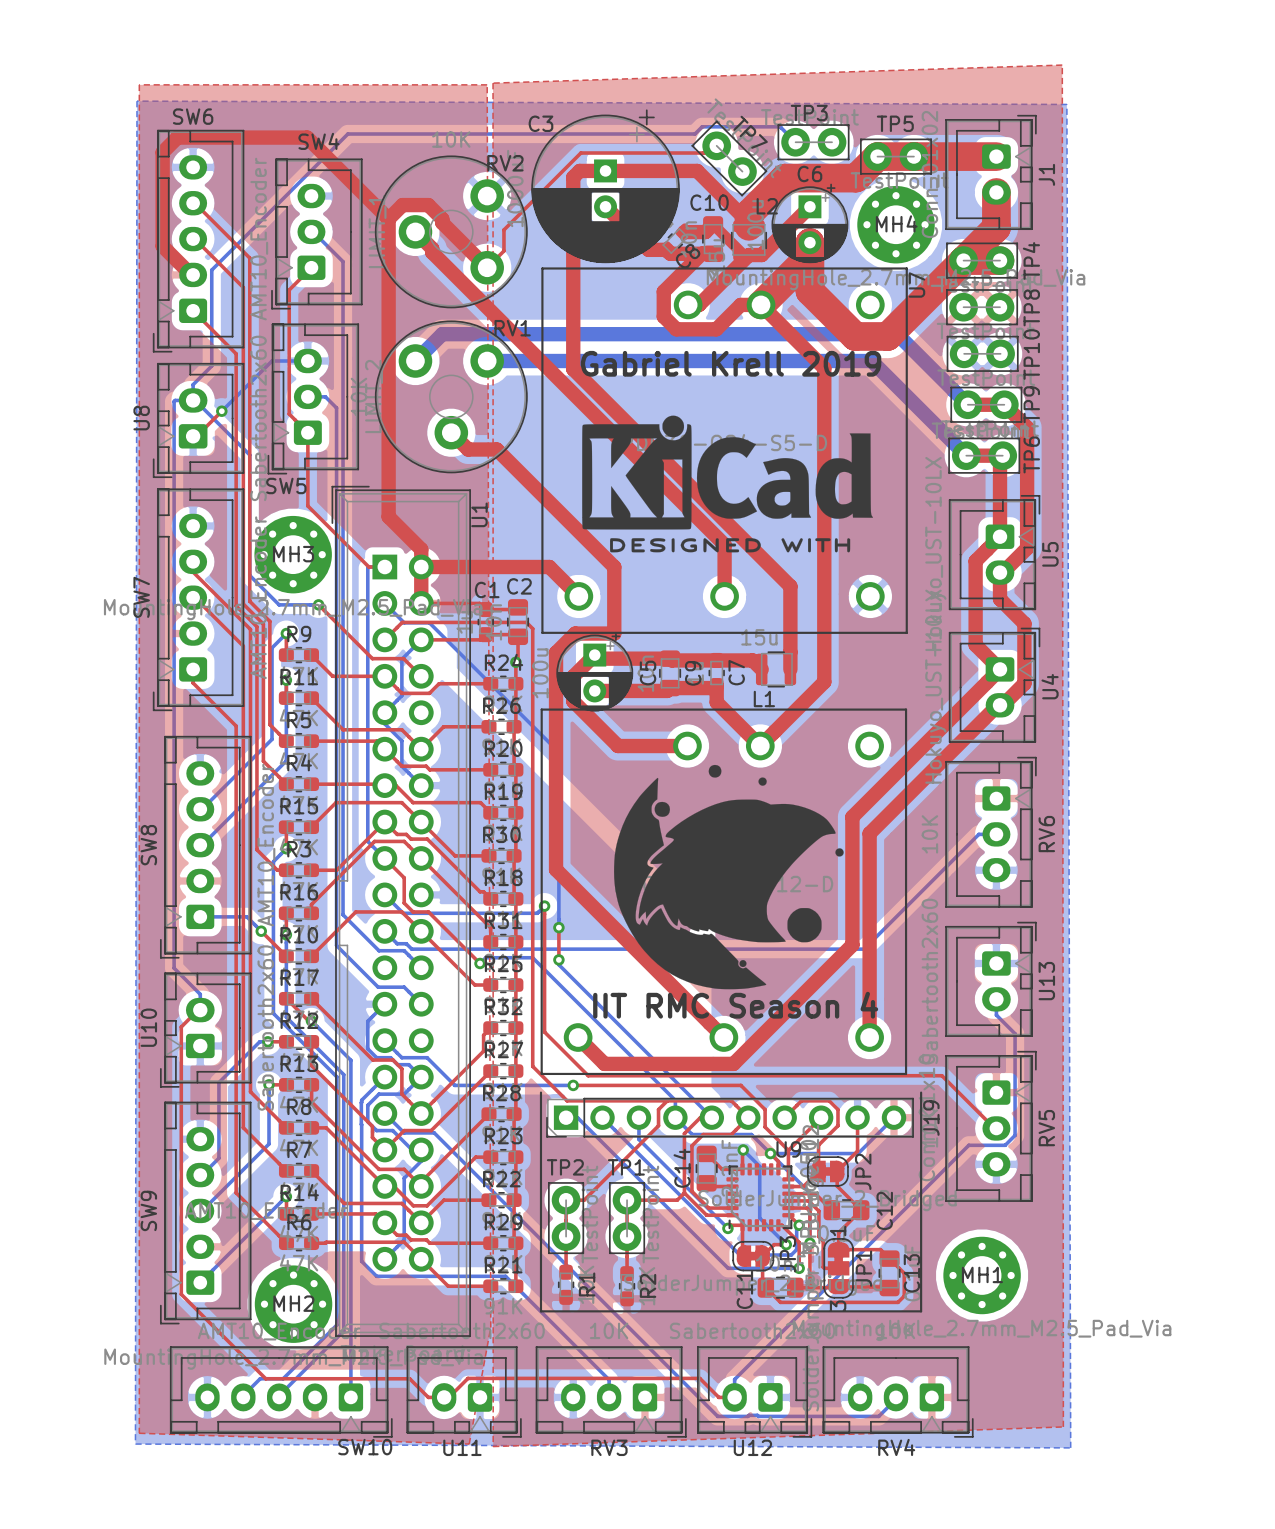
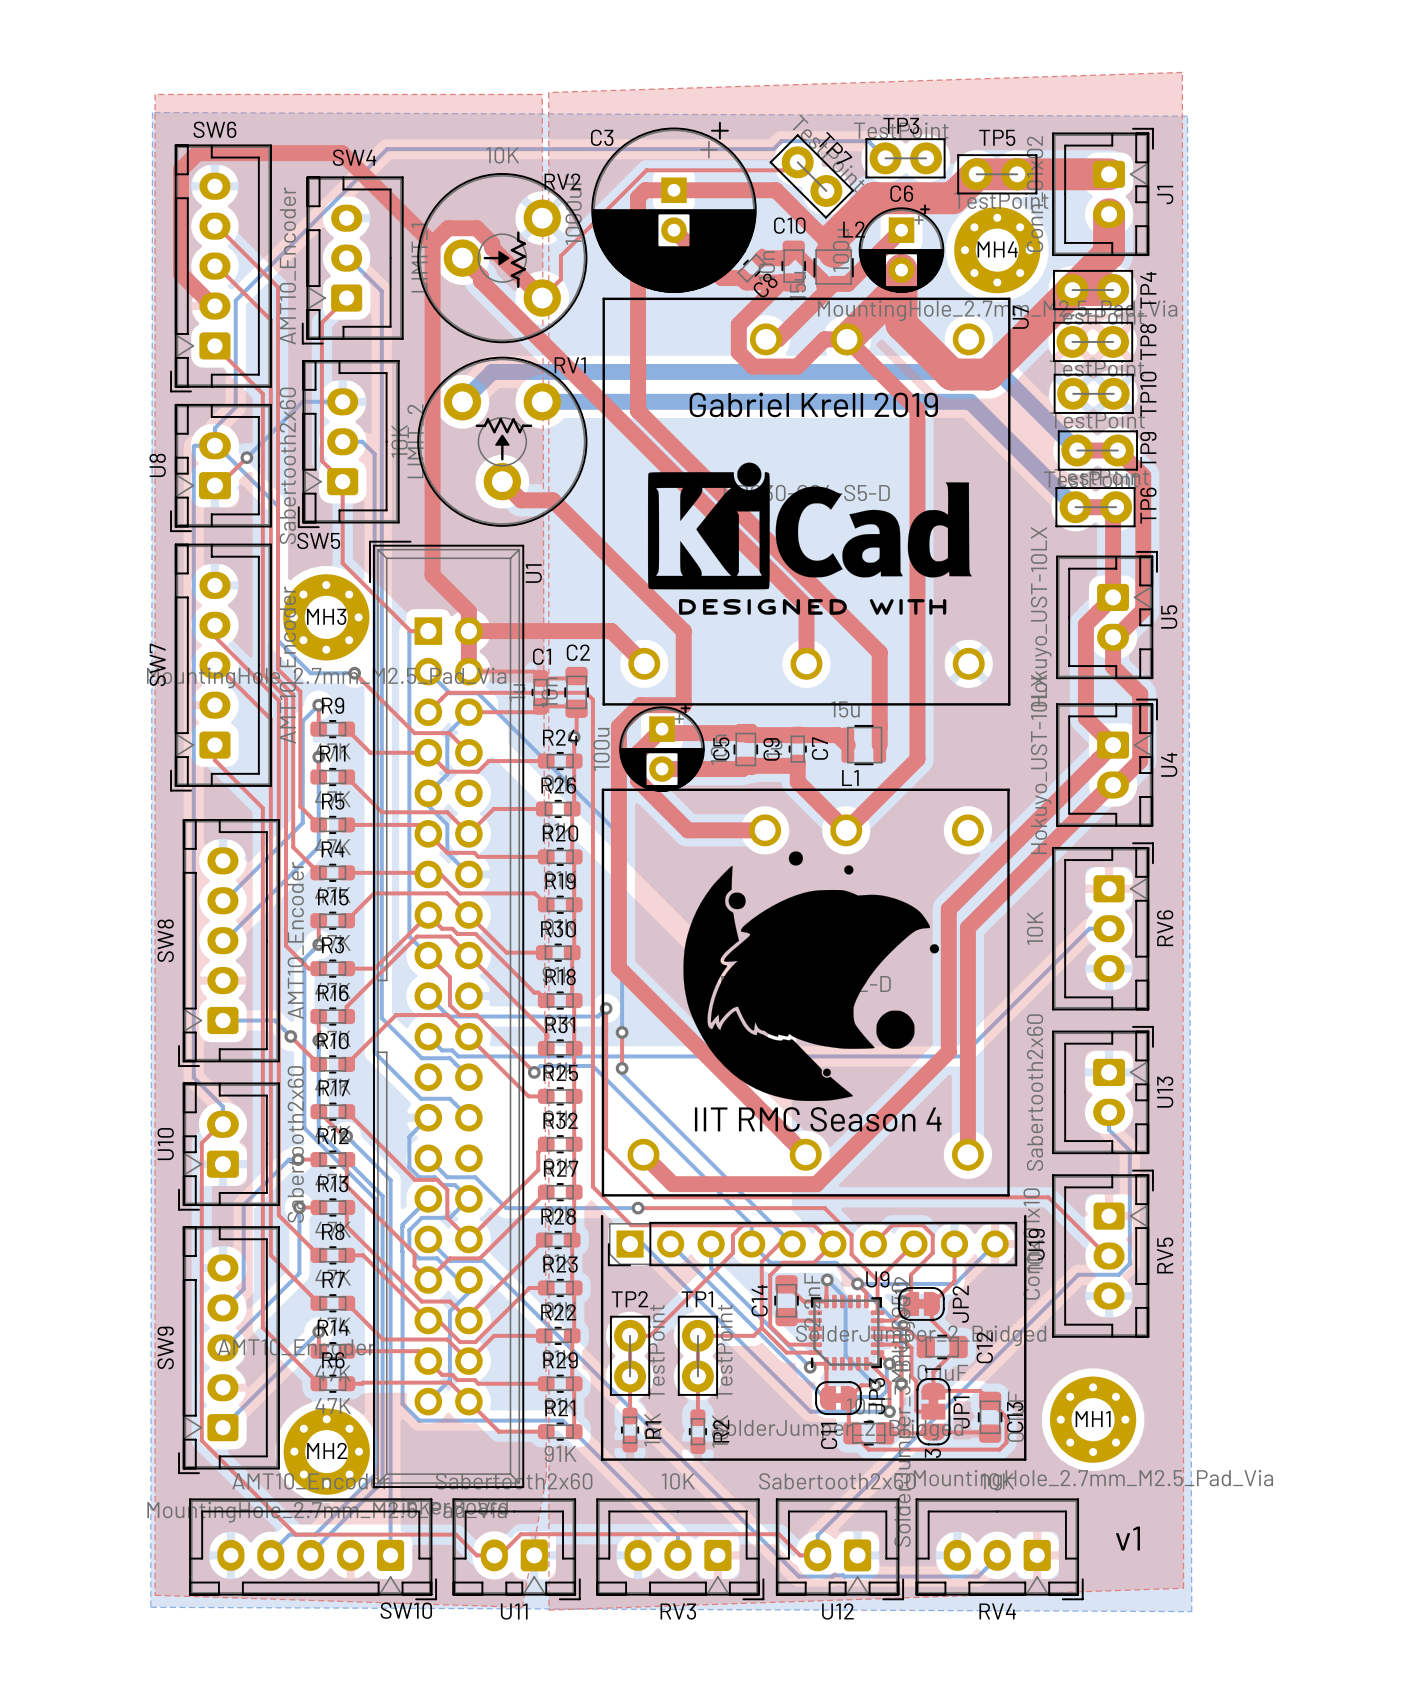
RV2 footprint: [374, 155, 528, 309] -> [417, 173, 588, 344]
RV1 footprint: [374, 320, 528, 474] -> [417, 356, 588, 527]
text: none -> v1 (1127, 1538)

